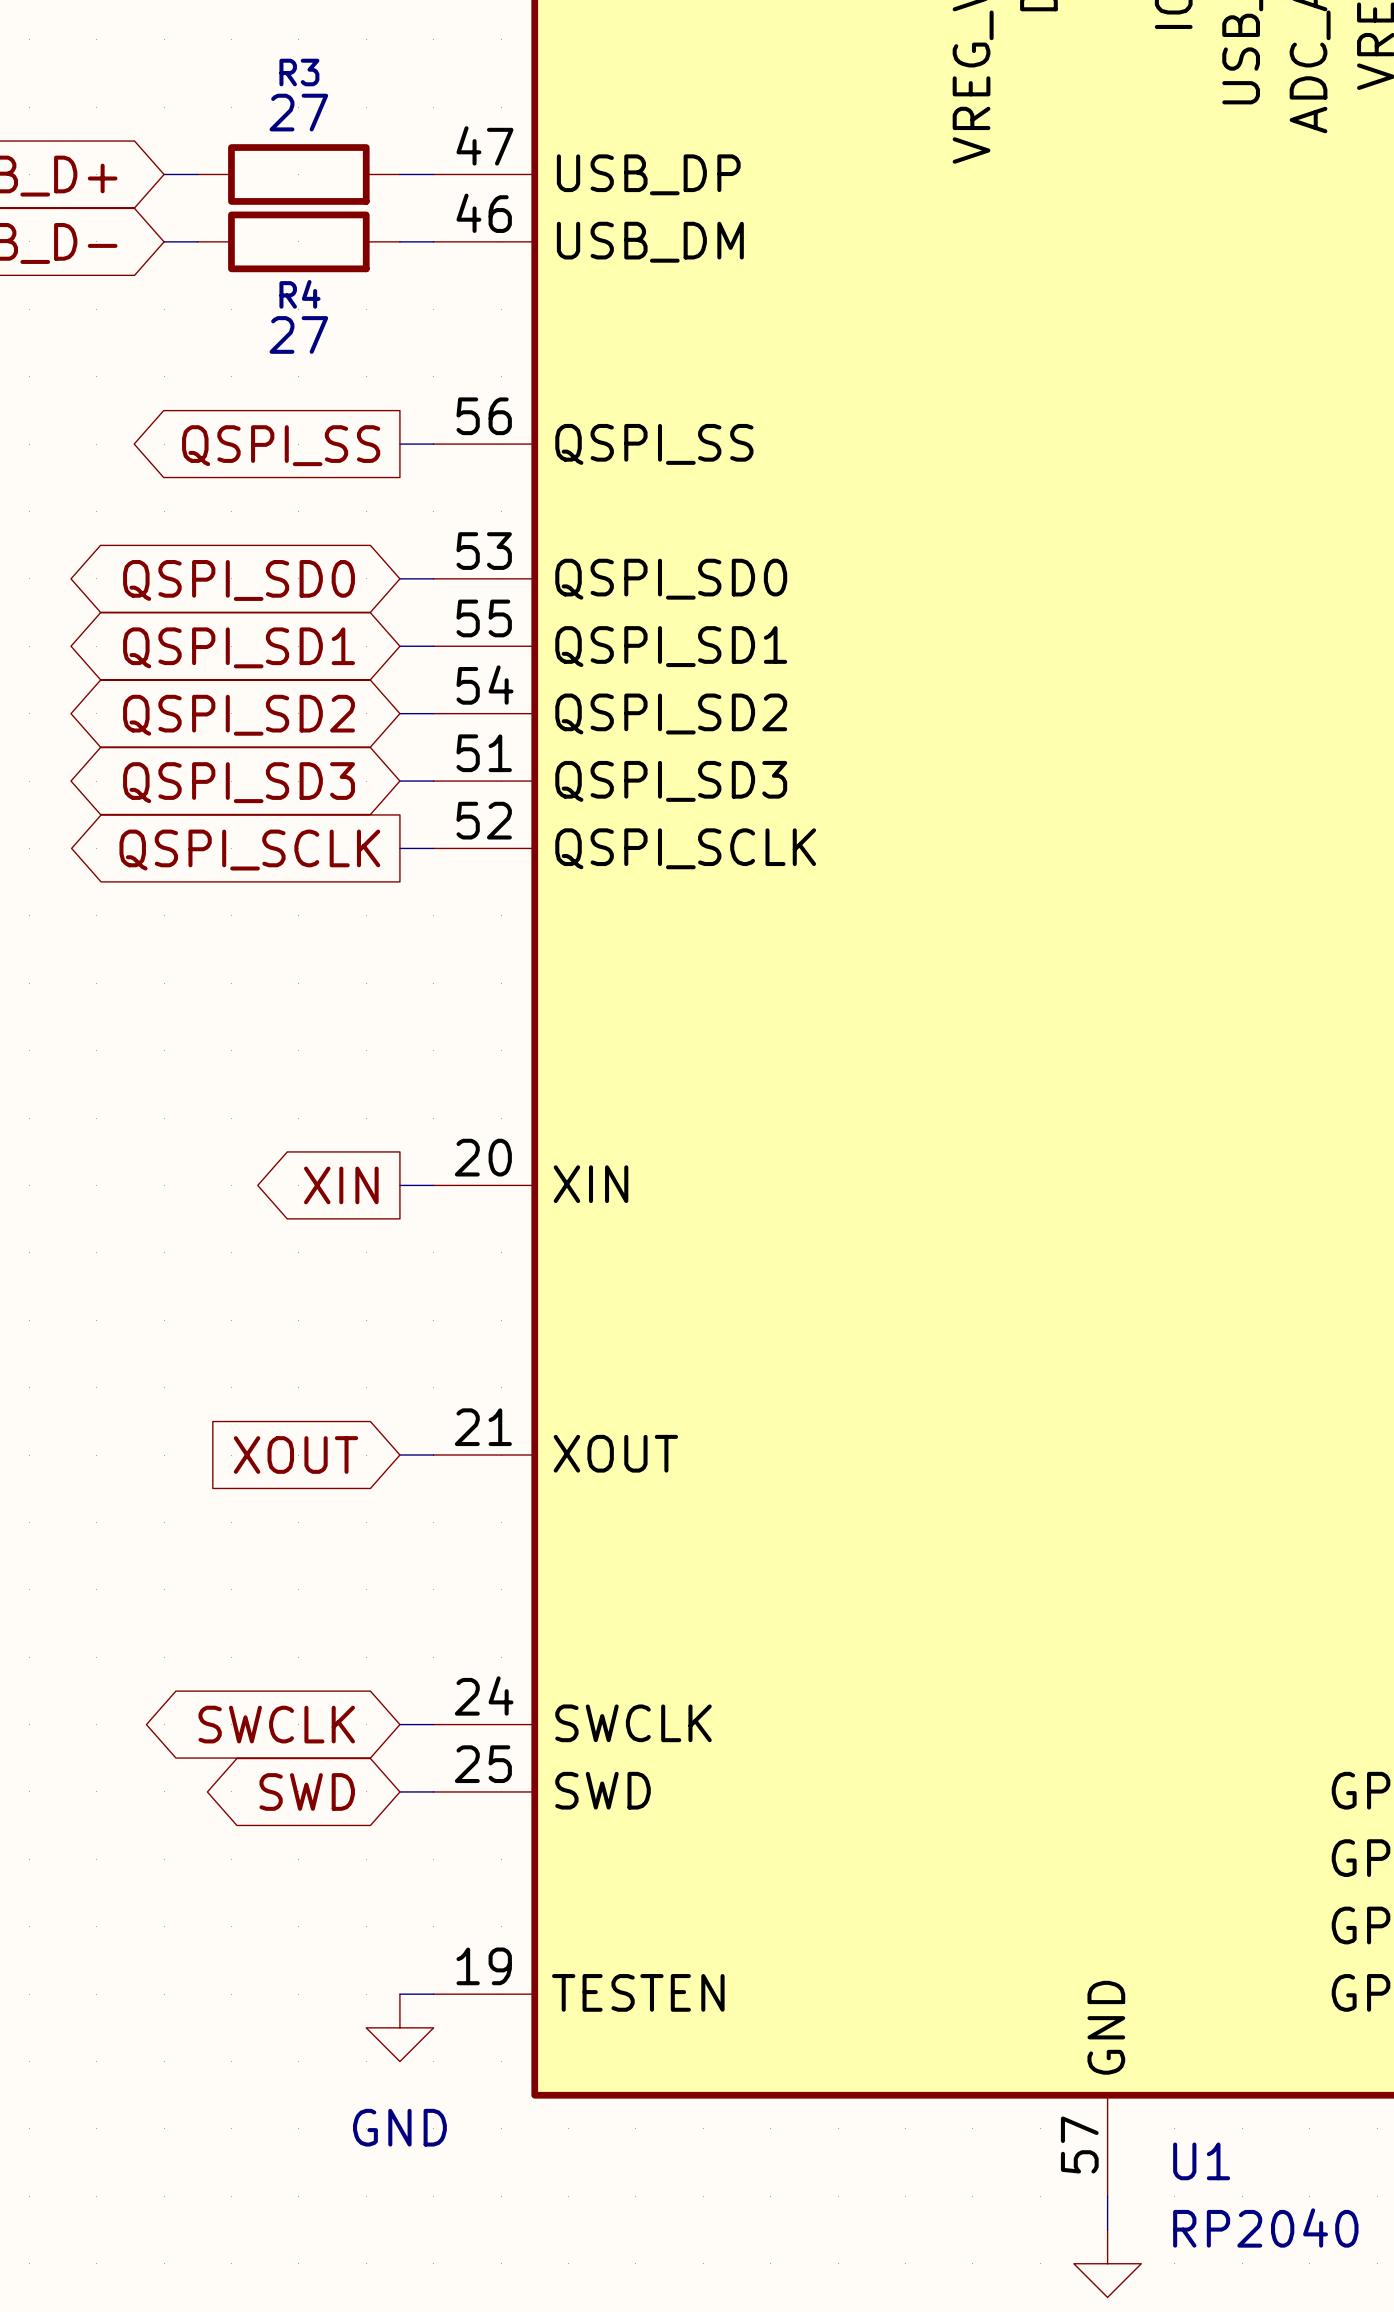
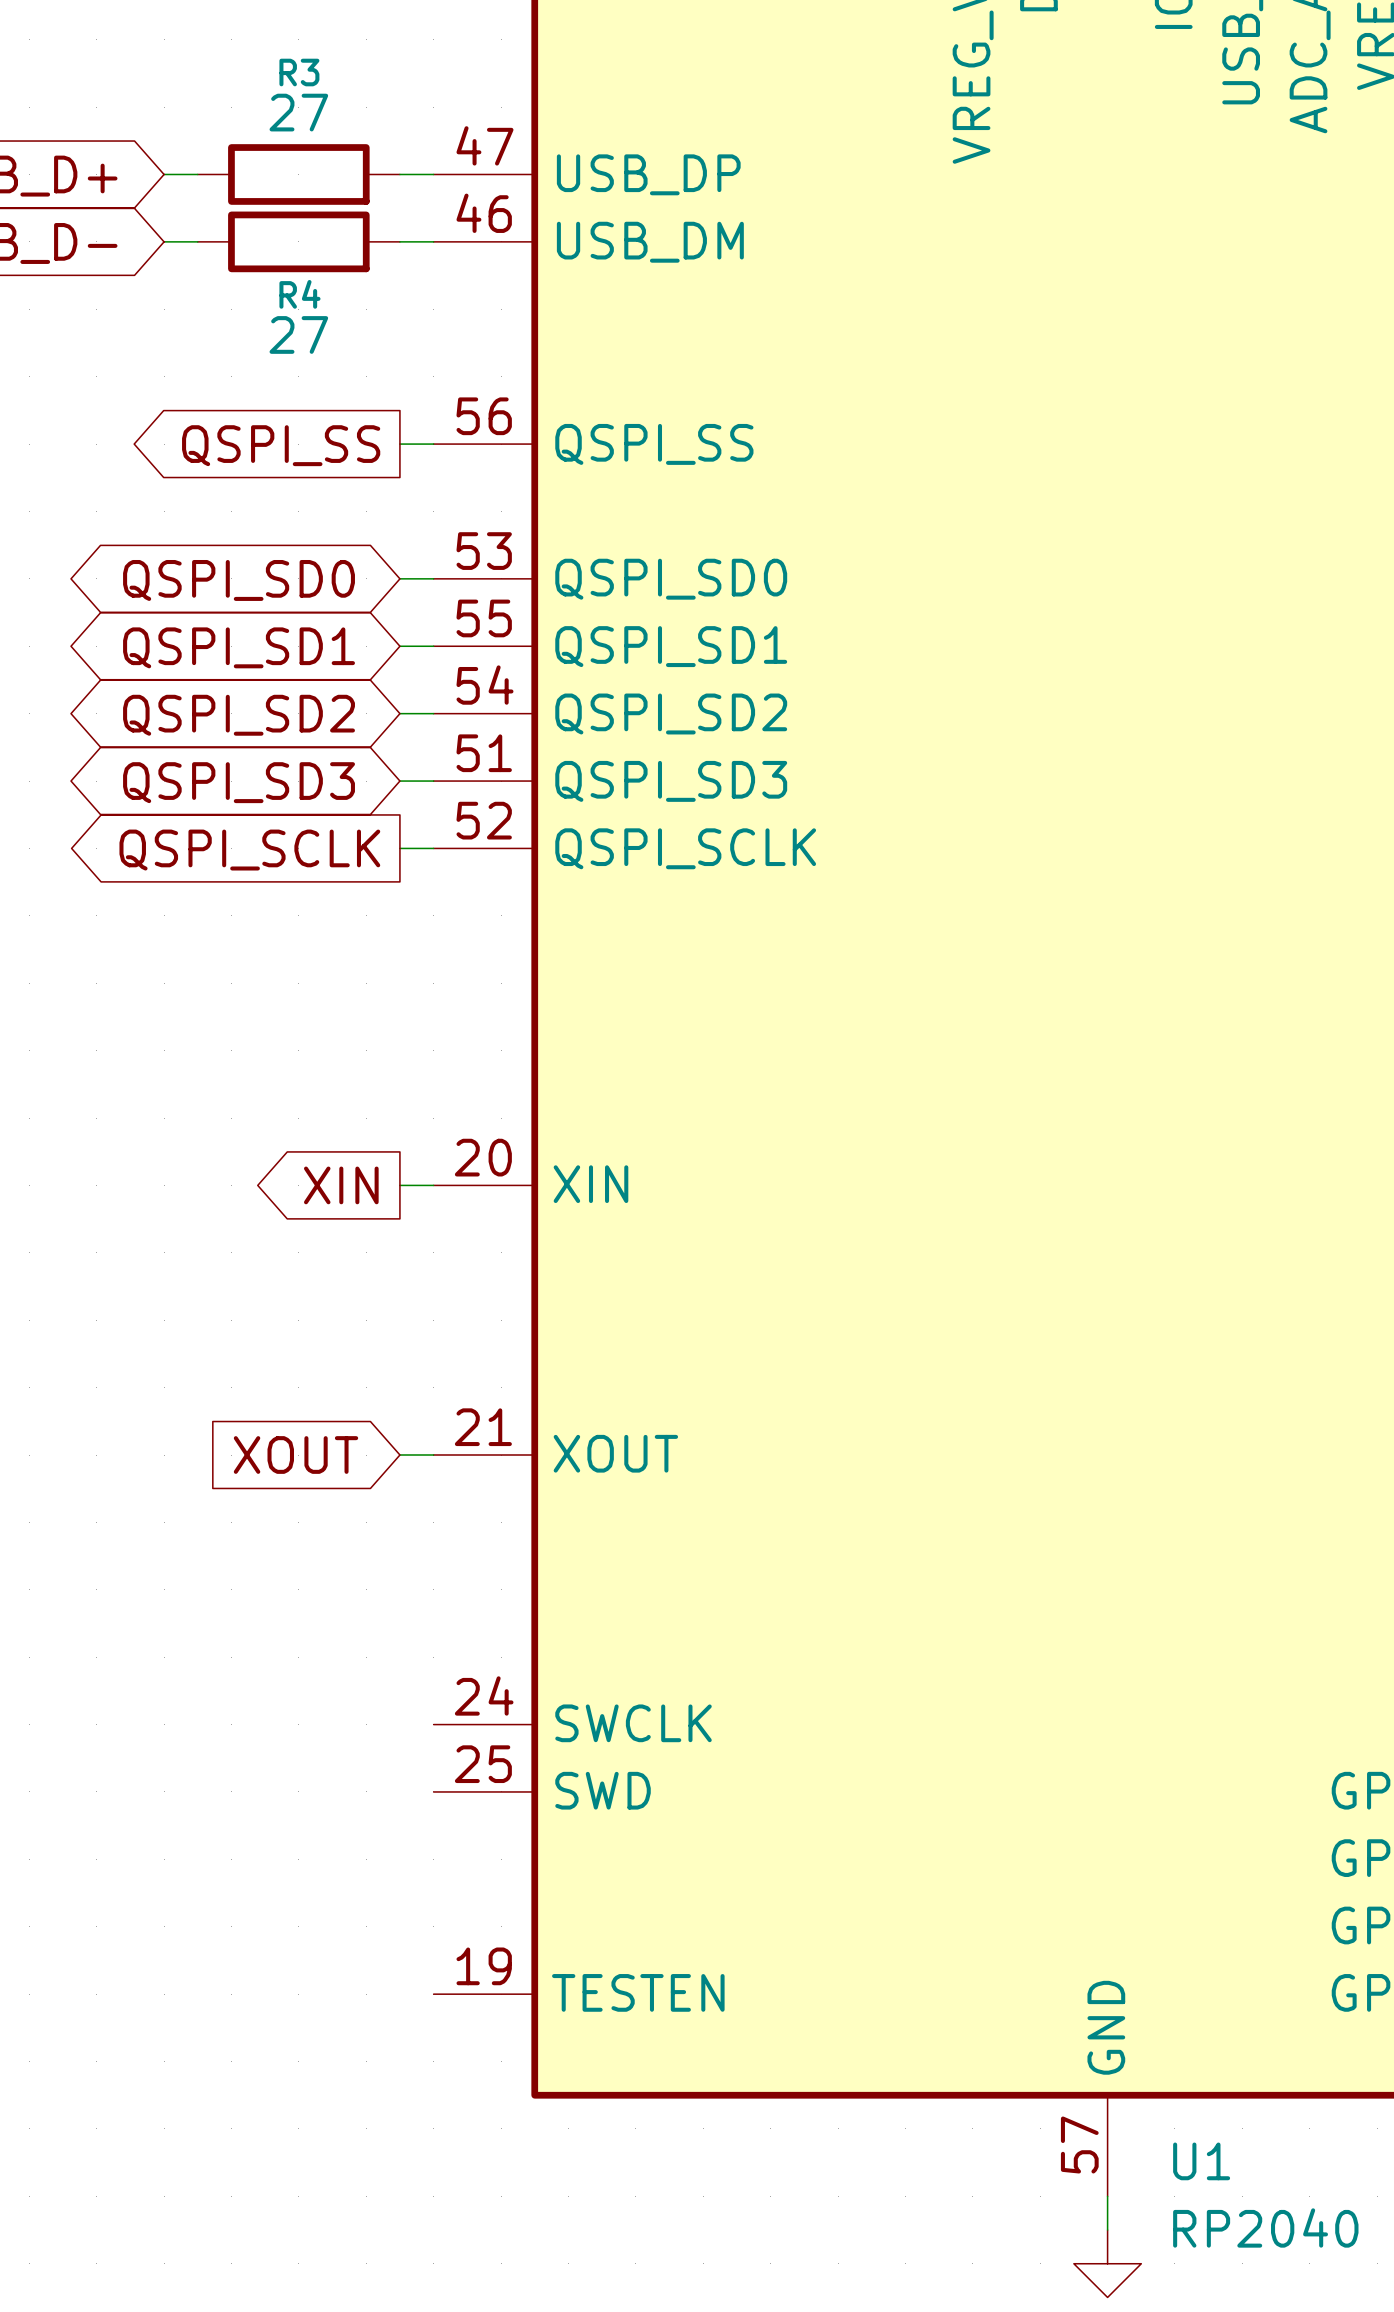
global label: SWCLK (276, 1724) -> none
wire: (399, 1724) (433, 1724) -> none
global label: SWD (307, 1791) -> none
wire: (399, 1791) (433, 1791) -> none
wire: (399, 1994) (433, 1994) -> none
power symbol: GND (399, 2027) -> none

